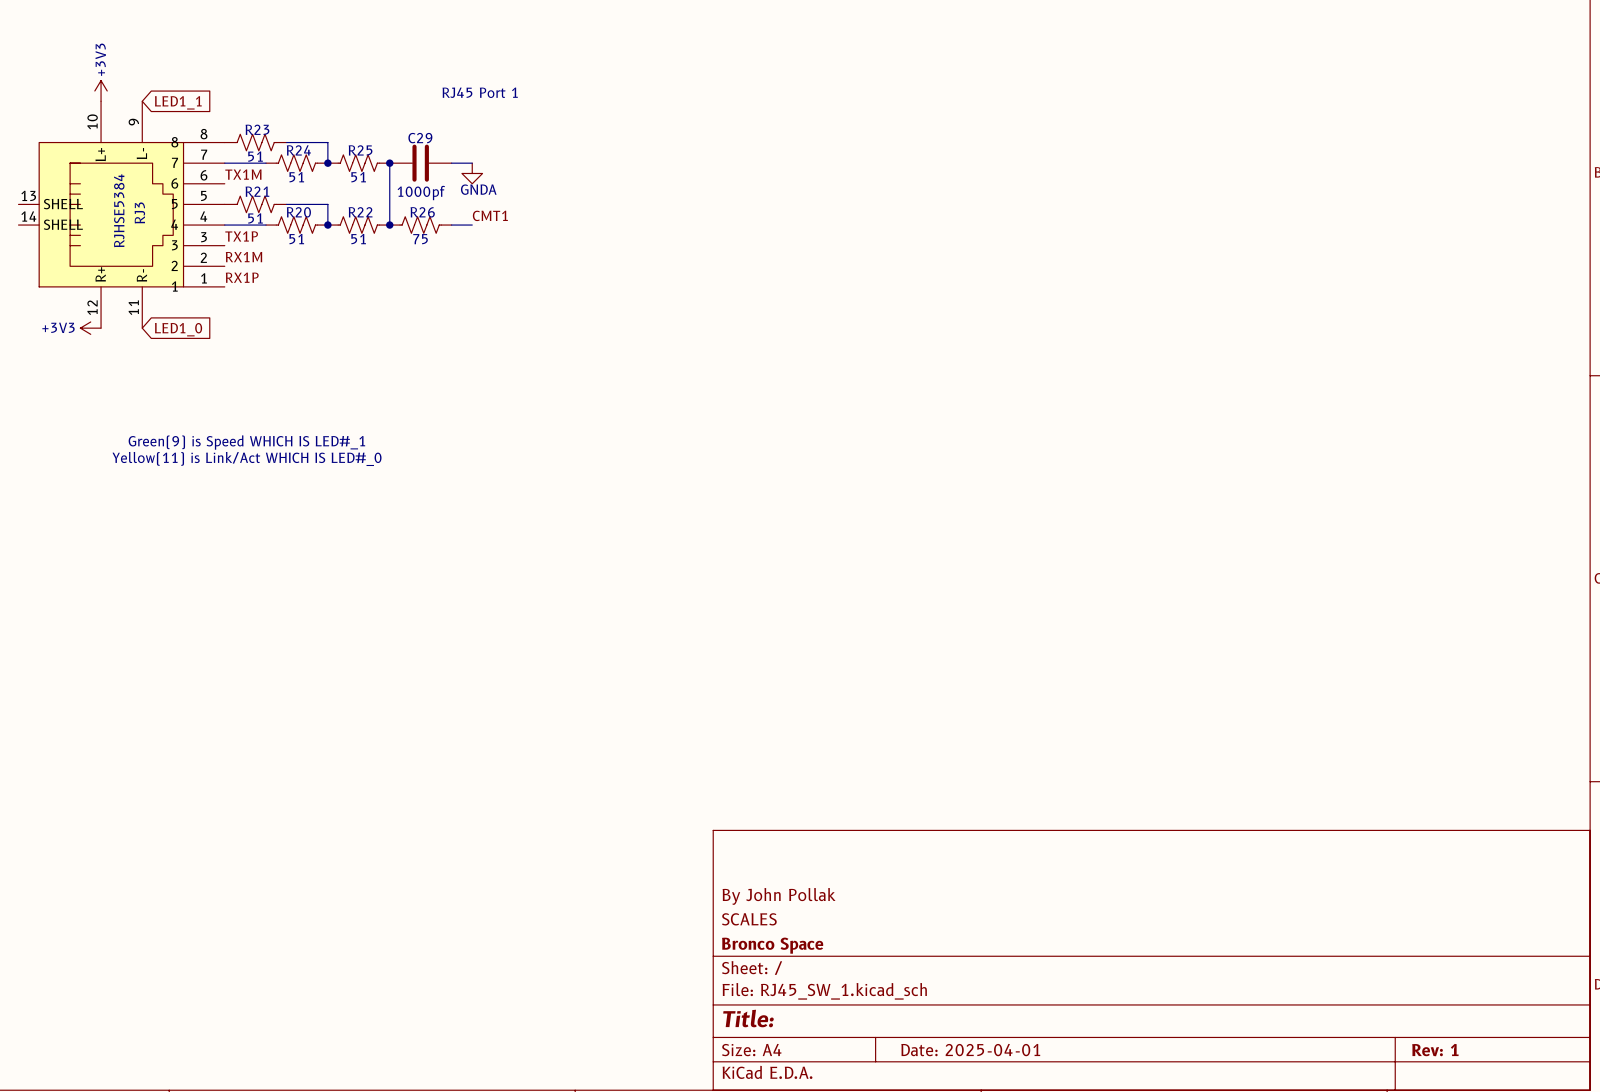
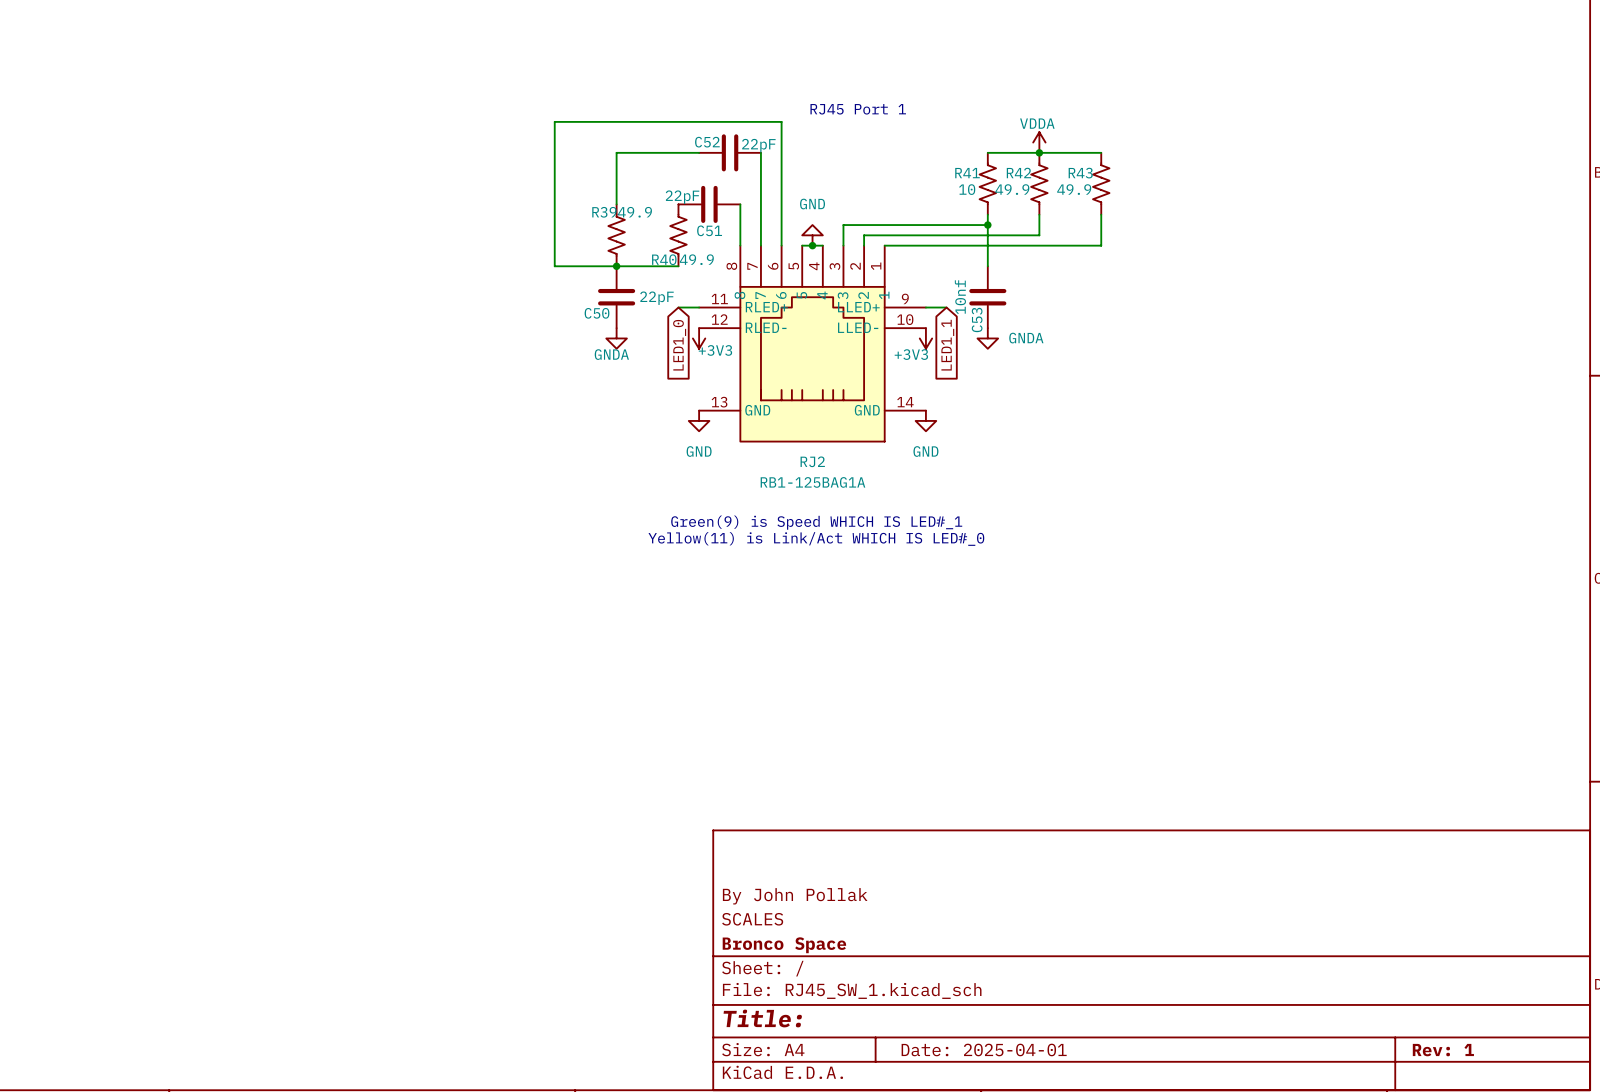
power symbol: +3V3 (101, 90) -> none
text: RJ45 Port 1 (480, 92) -> none
global label: LED1_1 (178, 102) -> none
text: none -> RJ45 Port 1 (858, 109)
R23: 51 (255, 142) -> none
wire: (286, 142) (327, 142) (327, 163) -> none
power symbol: none -> VDDA (1039, 142)
wire: none -> (699, 152) (616, 152) (616, 204)
C52: none -> 22pF (730, 152)
wire: none -> (760, 152) (760, 245)
wire: none -> (987, 152) (1101, 152)
junction: none -> (1039, 152)
wire: (224, 163) (266, 163) -> none
R24: 51 (296, 163) -> none
junction: (327, 163) -> none
R25: 51 (358, 163) -> none
wire: (389, 163) (389, 225) -> none
junction: (389, 163) -> none
C29: 1000pf (420, 163) -> none
wire: (451, 163) (472, 163) -> none
power symbol: GNDA (472, 173) -> none
label: TX1M (243, 174) -> none
R41: none -> 10 (987, 183)
R42: none -> 49.9 (1039, 183)
R43: none -> 49.9 (1101, 183)
R21: 51 (255, 204) -> none
wire: (286, 204) (327, 204) (327, 225) -> none
C51: none -> 22pF (709, 204)
wire: none -> (740, 204) (740, 245)
RJ3: RJHSE5384 (121, 214) -> none
wire: none -> (987, 214) (987, 266)
wire: none -> (1039, 214) (1039, 235) (864, 235) (864, 245)
wire: none -> (1101, 214) (1101, 245) (884, 245)
label: CMT1 (490, 215) -> none
wire: (224, 225) (266, 225) -> none
R20: 51 (296, 225) -> none
junction: (327, 225) -> none
R22: 51 (358, 225) -> none
junction: (389, 225) -> none
R26: 75 (420, 225) -> none
wire: (451, 225) (472, 225) -> none
wire: none -> (987, 225) (843, 225) (843, 245)
junction: none -> (987, 225)
R39: none -> 49.9 (616, 235)
R40: none -> 49.9 (678, 235)
power symbol: none -> GND (812, 235)
label: TX1P (241, 236) -> none
wire: none -> (781, 245) (781, 121) (554, 121) (554, 266) (678, 266)
wire: none -> (802, 245) (822, 245)
junction: none -> (812, 245)
label: RX1M (243, 257) -> none
junction: none -> (616, 266)
label: RX1P (242, 277) -> none
C50: none -> 22pF (616, 297)
C53: none -> 10nf (987, 297)
wire: none -> (678, 307) (699, 307)
wire: none -> (925, 307) (946, 307)
power symbol: +3V3 (90, 328) -> none
global label: LED1_0 (178, 329) -> none
power symbol: none -> GNDA (616, 338)
power symbol: none -> +3V3 (699, 338)
power symbol: none -> +3V3 (925, 338)
power symbol: none -> GNDA (987, 338)
global label: none -> LED1_0 (679, 345)
RJ2: none -> RB1-125BAG1A (812, 343)
global label: none -> LED1_1 (947, 345)
power symbol: none -> GND (699, 420)
power symbol: none -> GND (925, 420)
text: Green(9) is Speed WHICH IS LED#_1 (246, 442) -> none
text: Yellow(11) is Link/Act WHICH IS LED#_0 (247, 458) -> none
text: none -> Green(9) is Speed WHICH IS LED#_1 (816, 522)
text: none -> Yellow(11) is Link/Act WHICH IS LED#_0 (816, 538)

